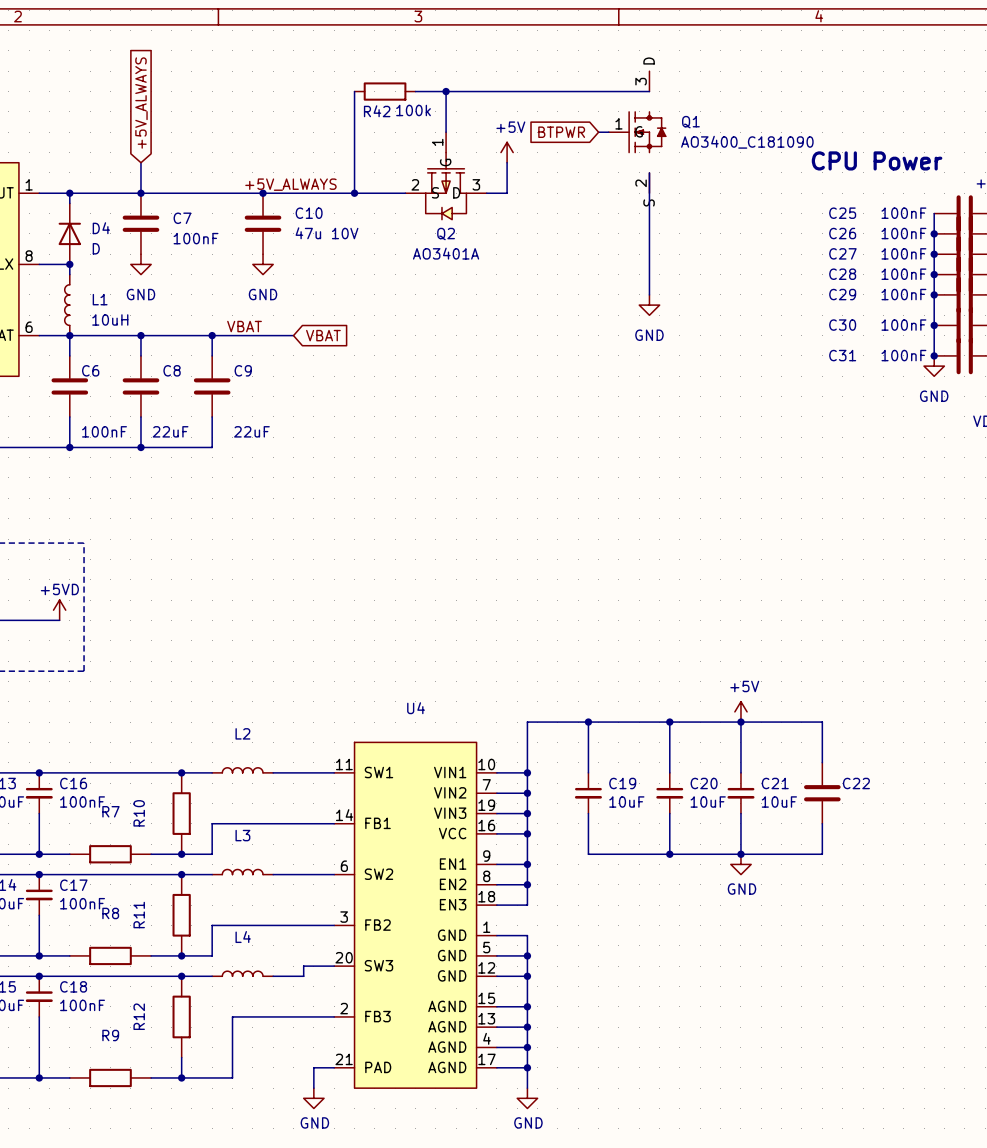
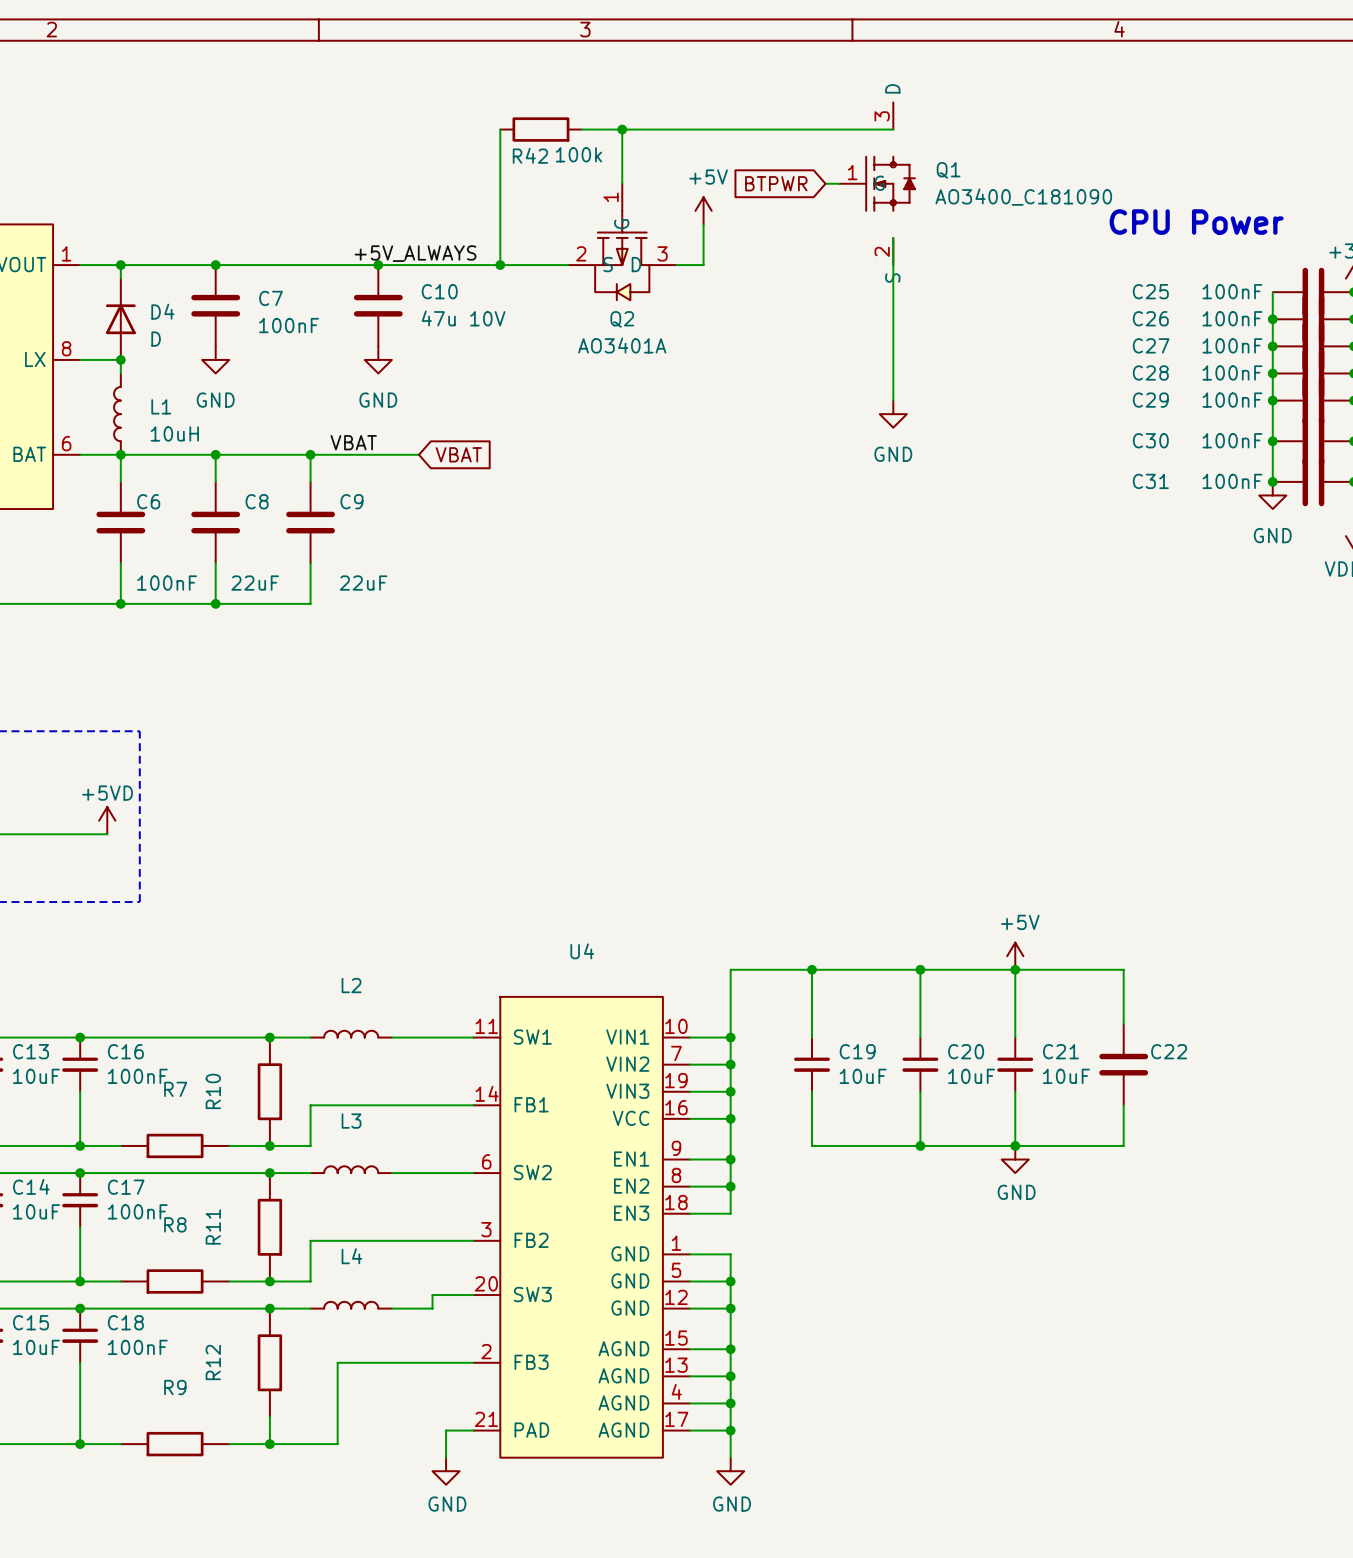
global label: +5V_ALWAYS (141, 103) -> none
wire: (140, 162) (140, 193) -> none

